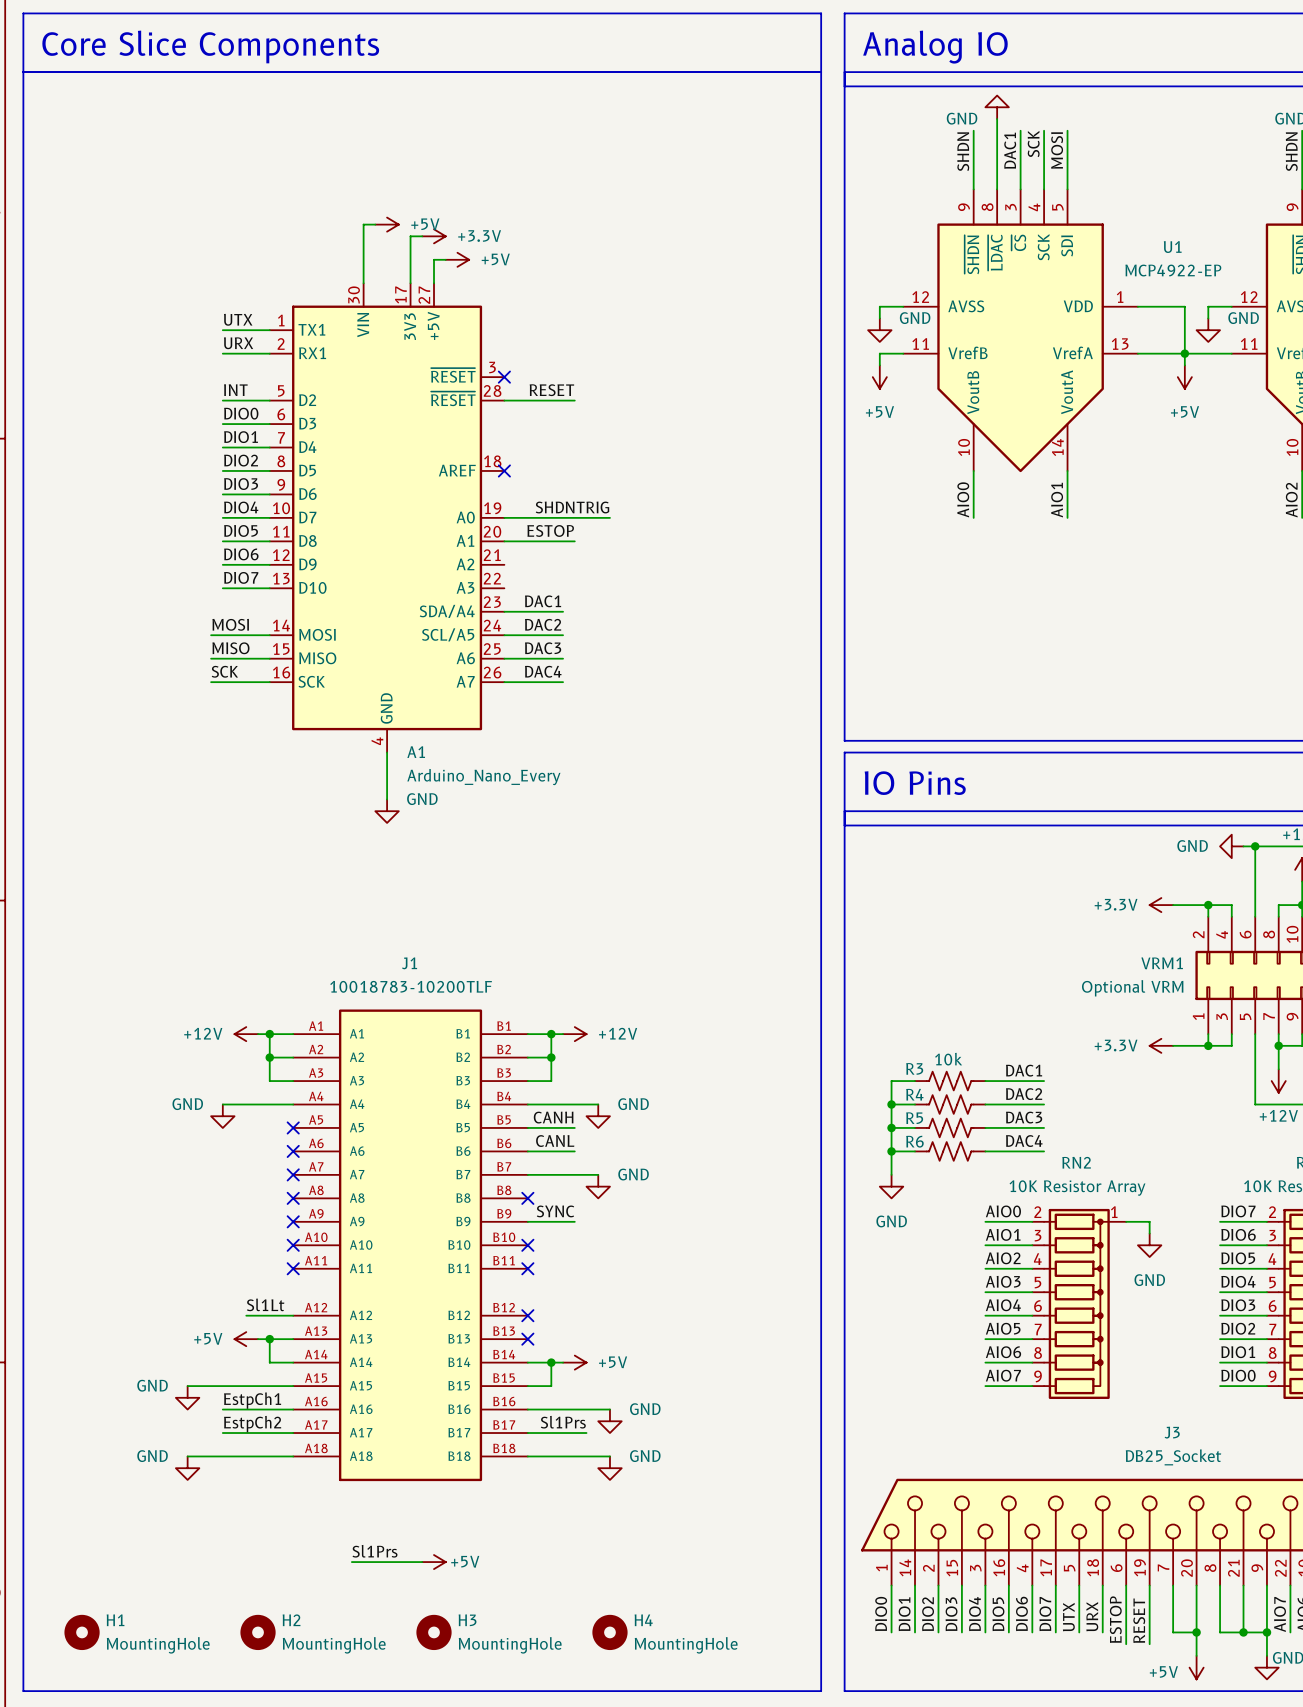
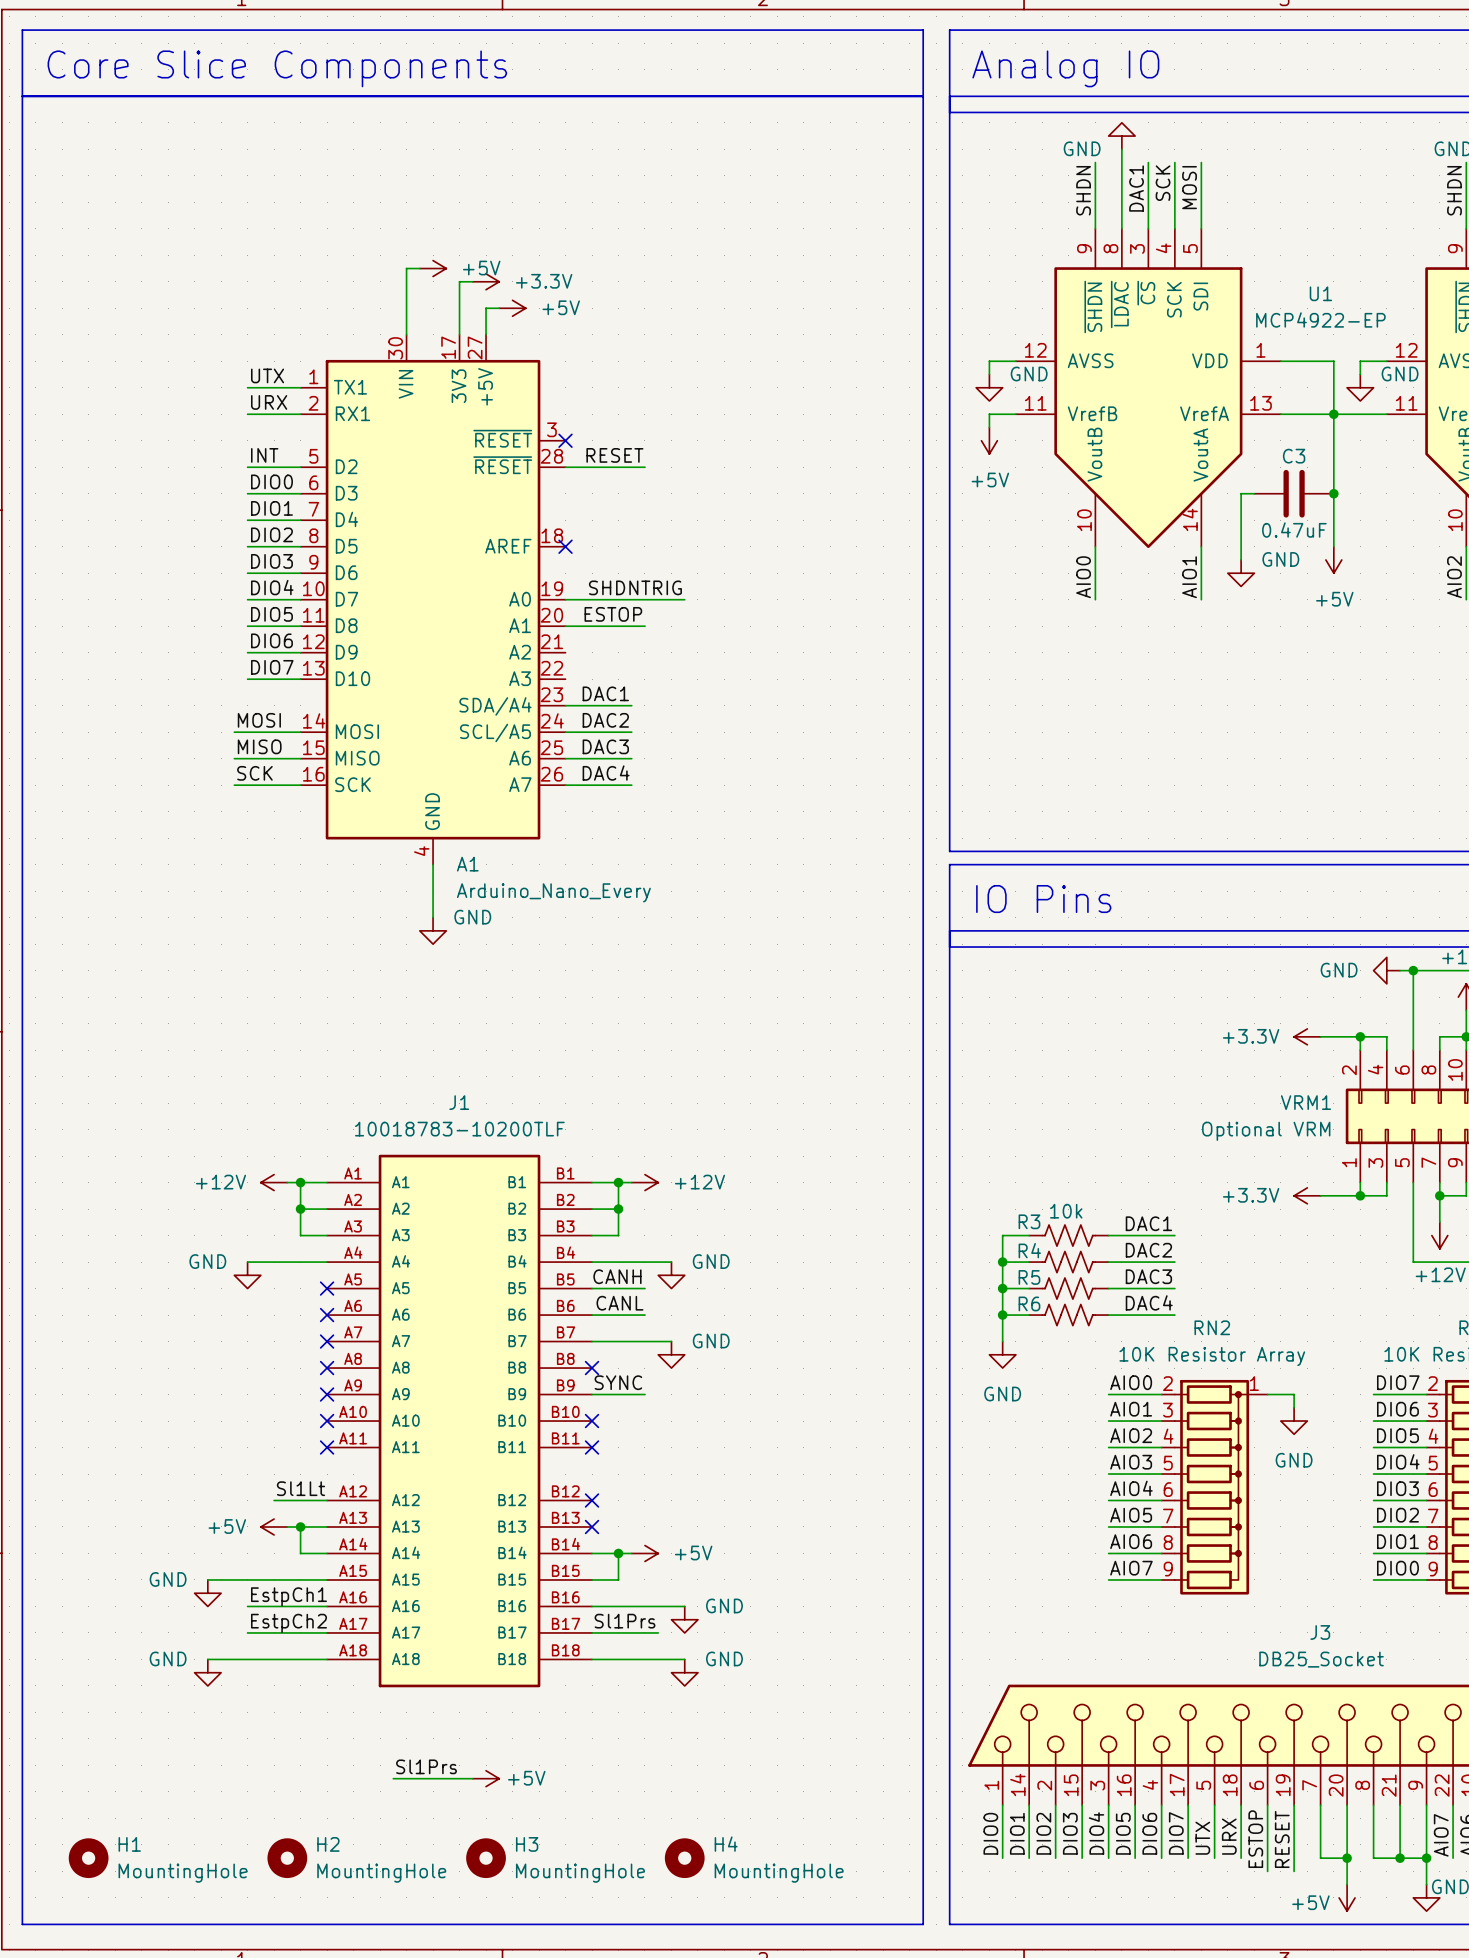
wire: none -> (1333, 427) (1333, 546)
power symbol position: +5V (1184, 377) -> +5V (1333, 559)
wire: none -> (1254, 493) (1241, 493) (1241, 559)
C3: none -> 0.47uF (1294, 493)
junction: none -> (1333, 493)
power symbol: none -> GND (1241, 573)

